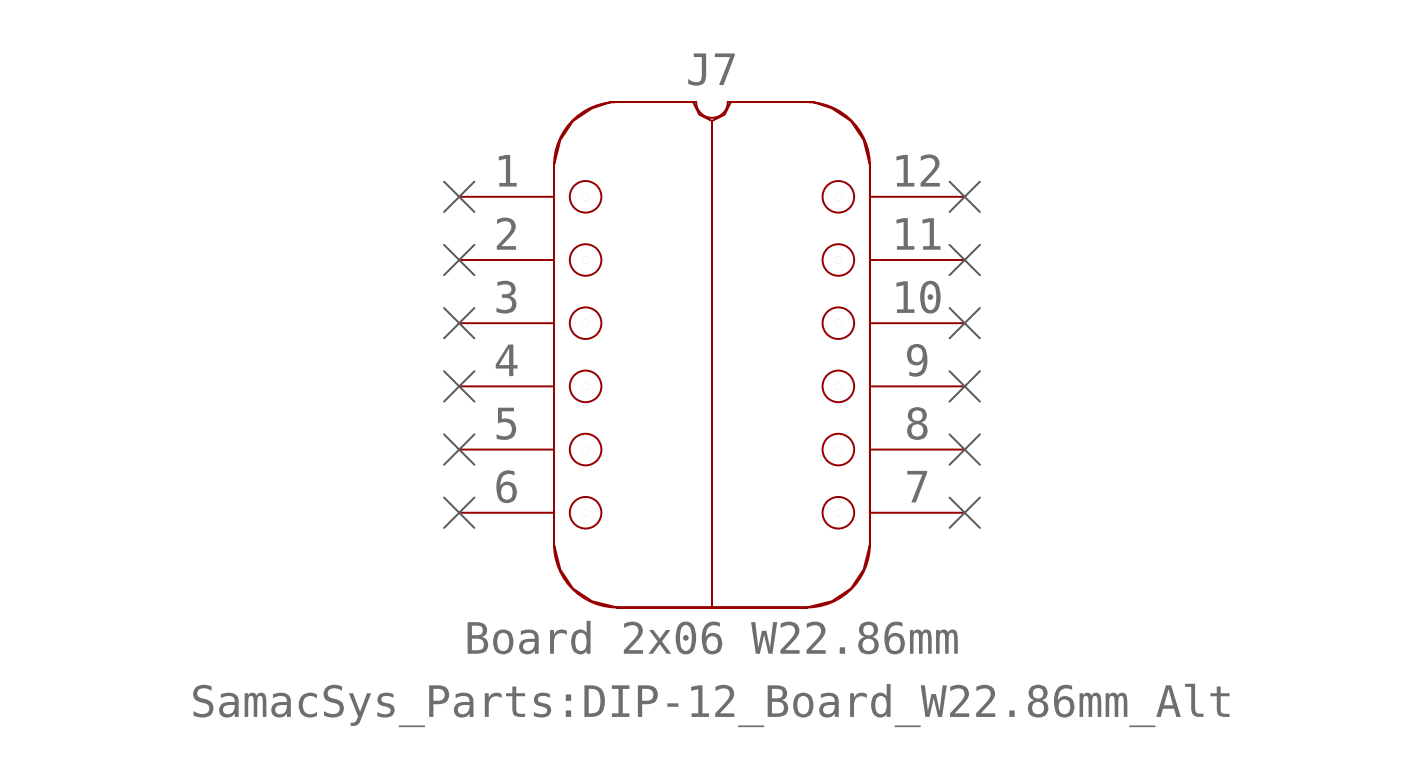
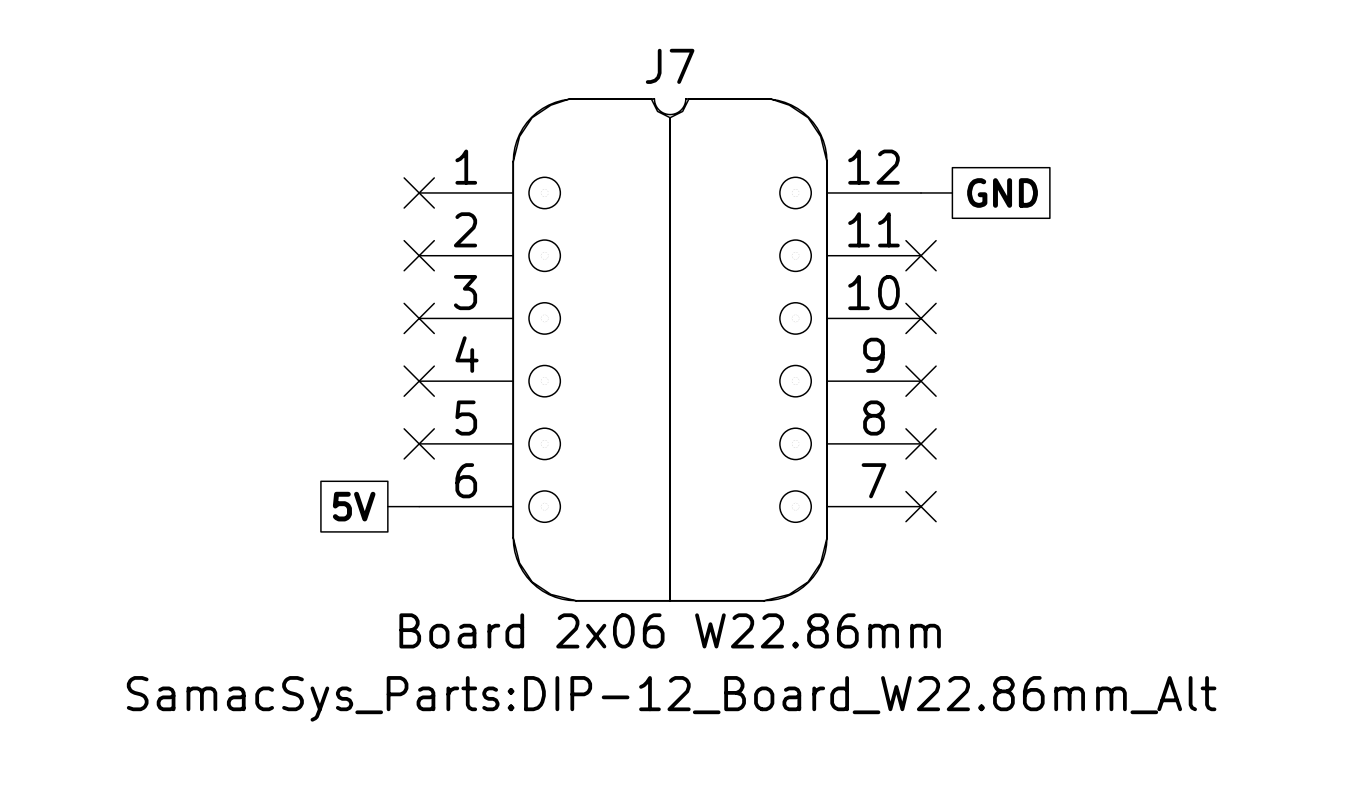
wire: none -> (921, 192) (952, 192)
no-connect mark: (964, 196) -> none
global label: none -> GND (1002, 192)
global label: none -> 5V (354, 506)
wire: none -> (387, 506) (419, 506)
no-connect mark: (459, 512) -> none

